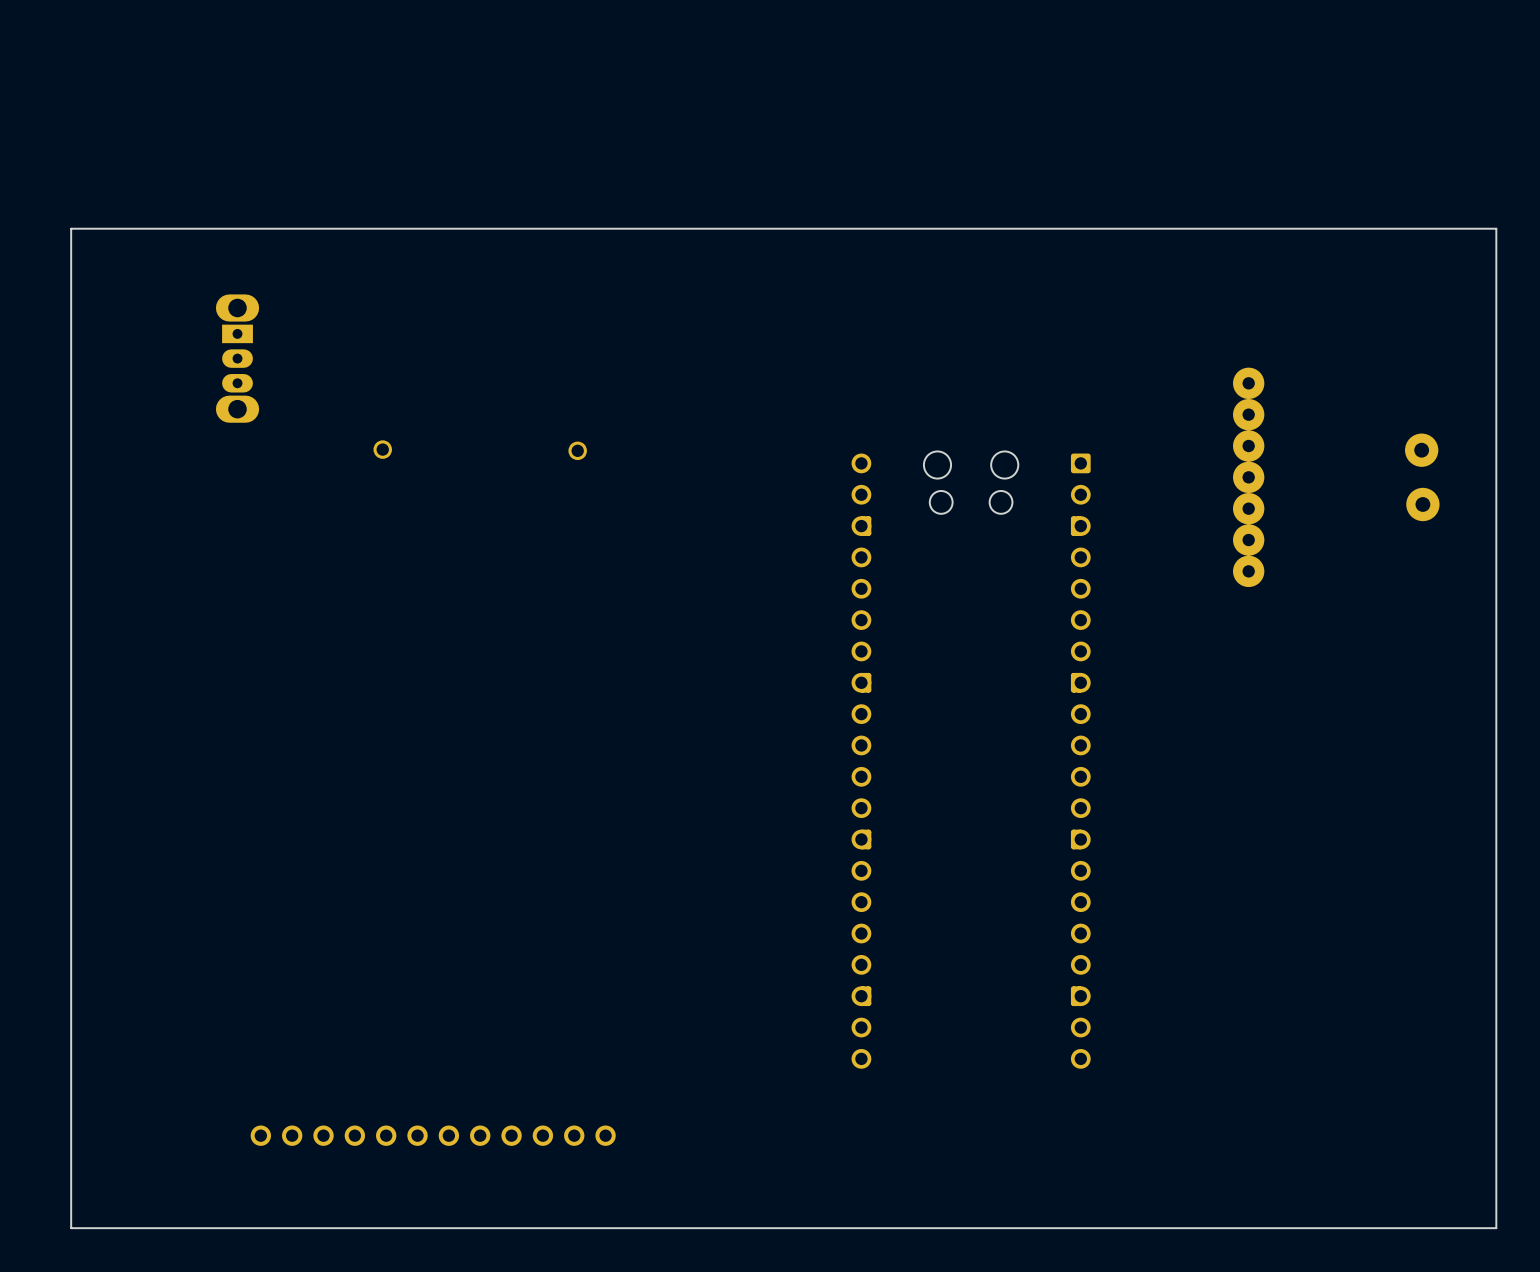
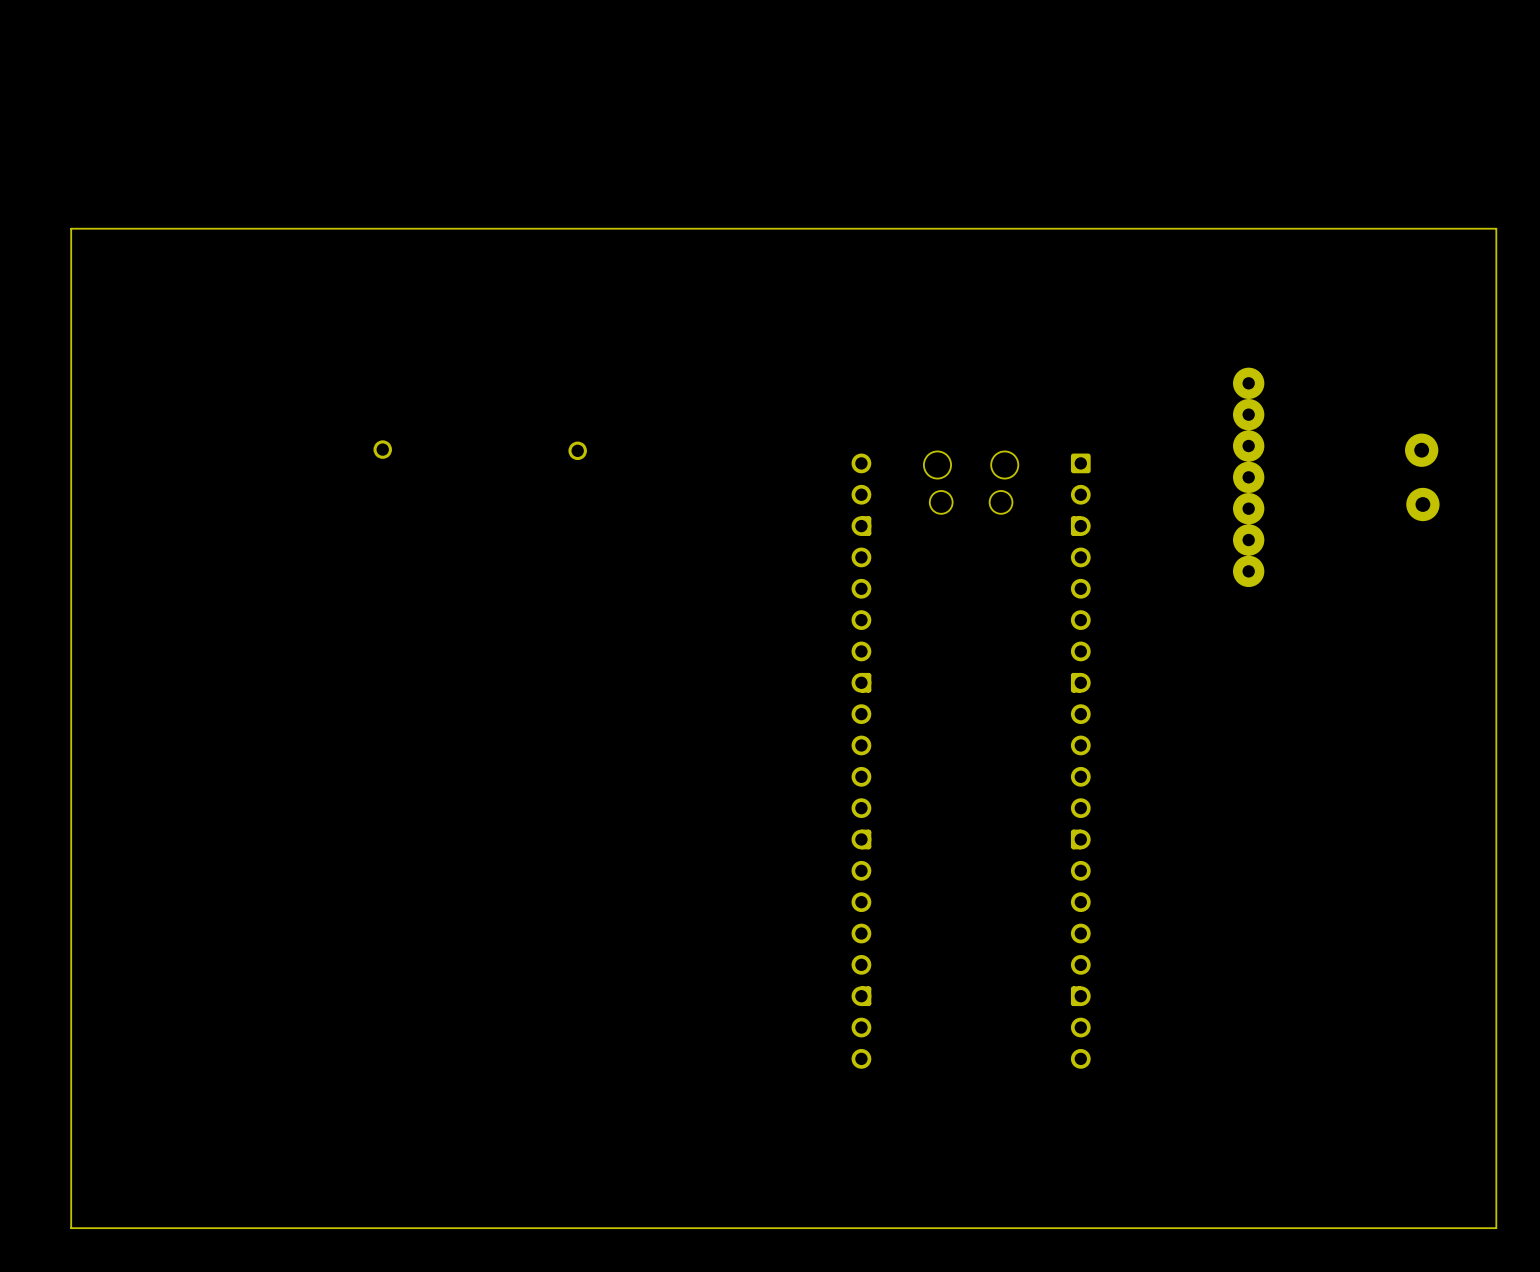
part: (237, 358) -> none
part: (433, 1135) -> none

